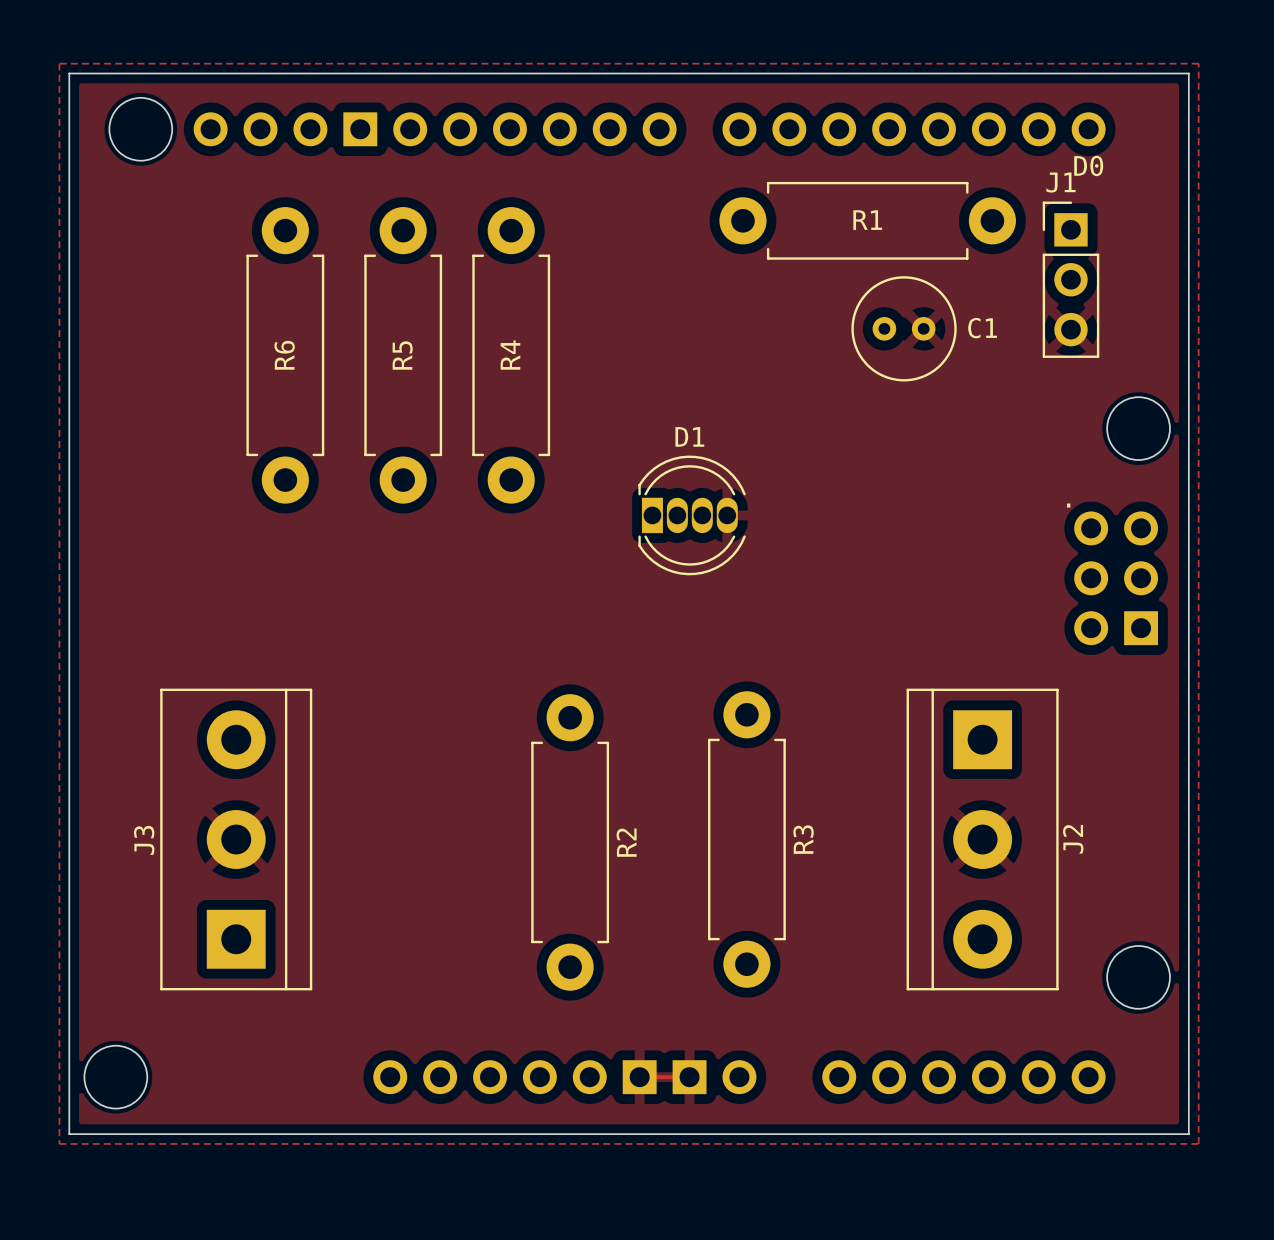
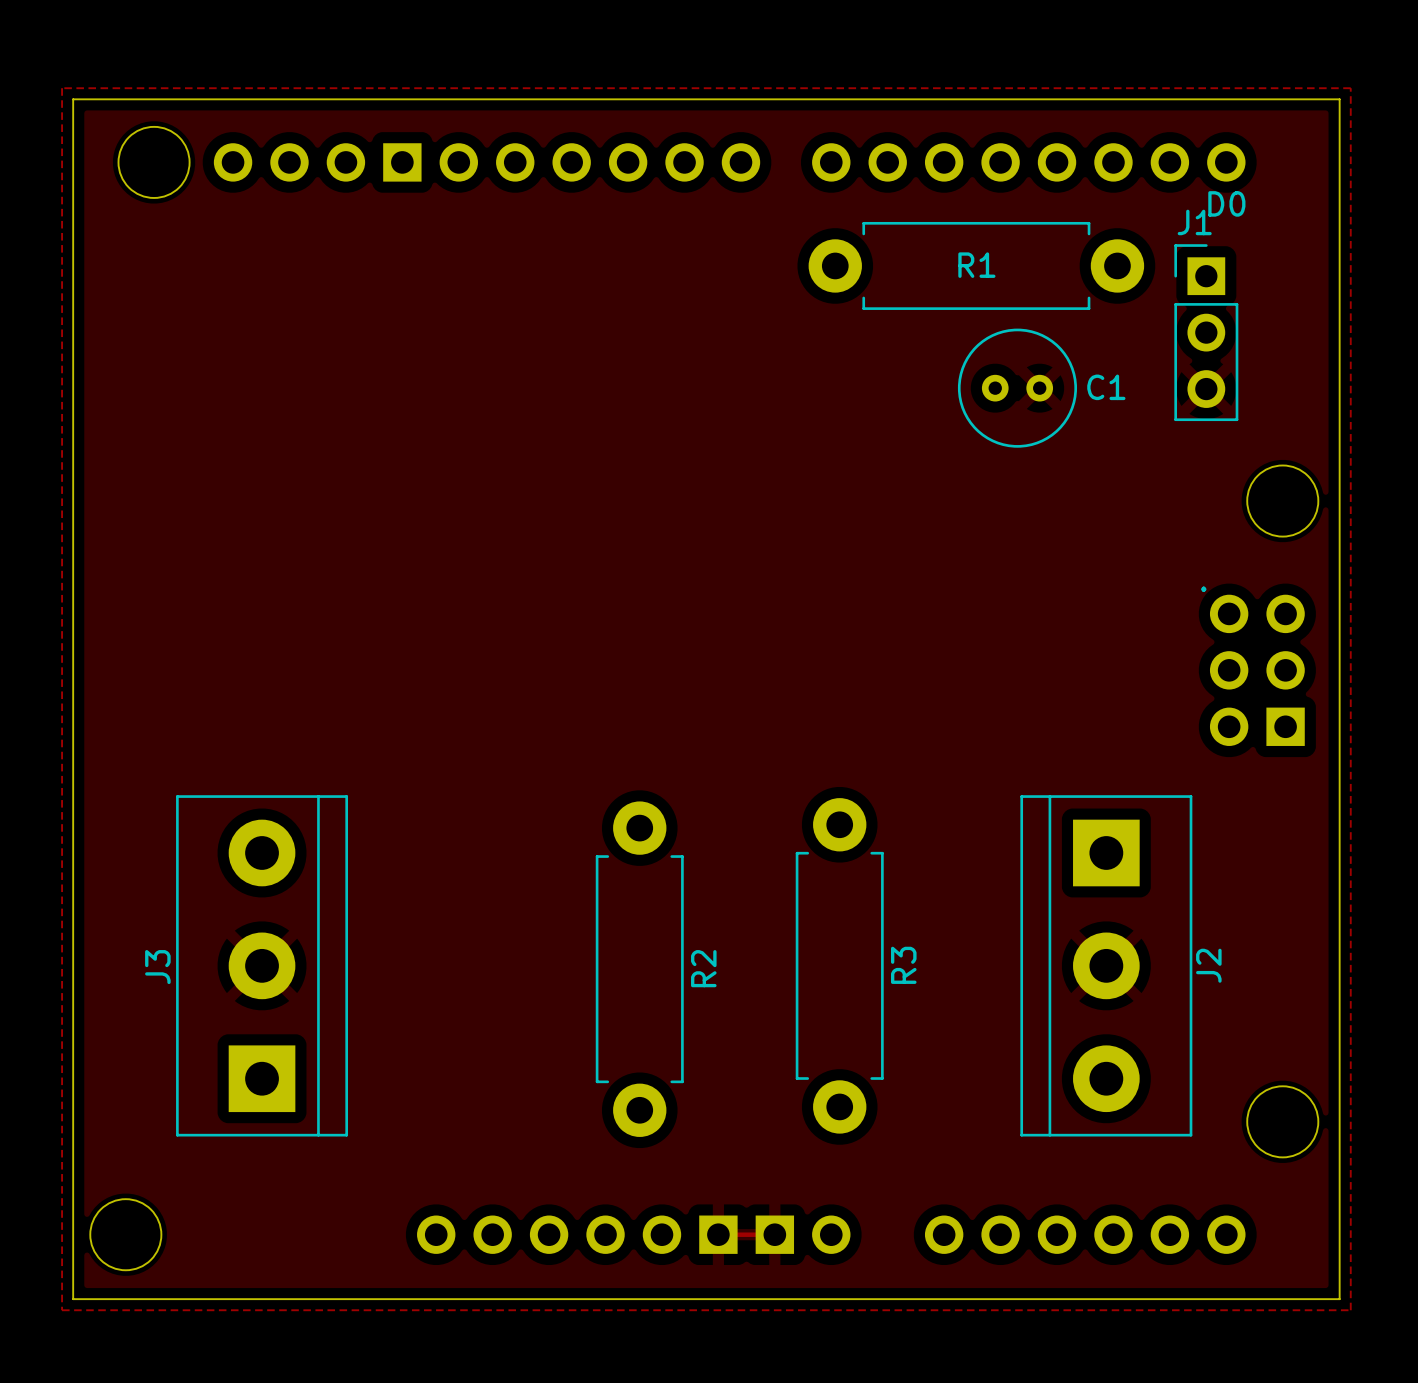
R6: (285, 355) -> none
R5: (403, 355) -> none
R4: (511, 355) -> none
D1: (692, 515) -> none

